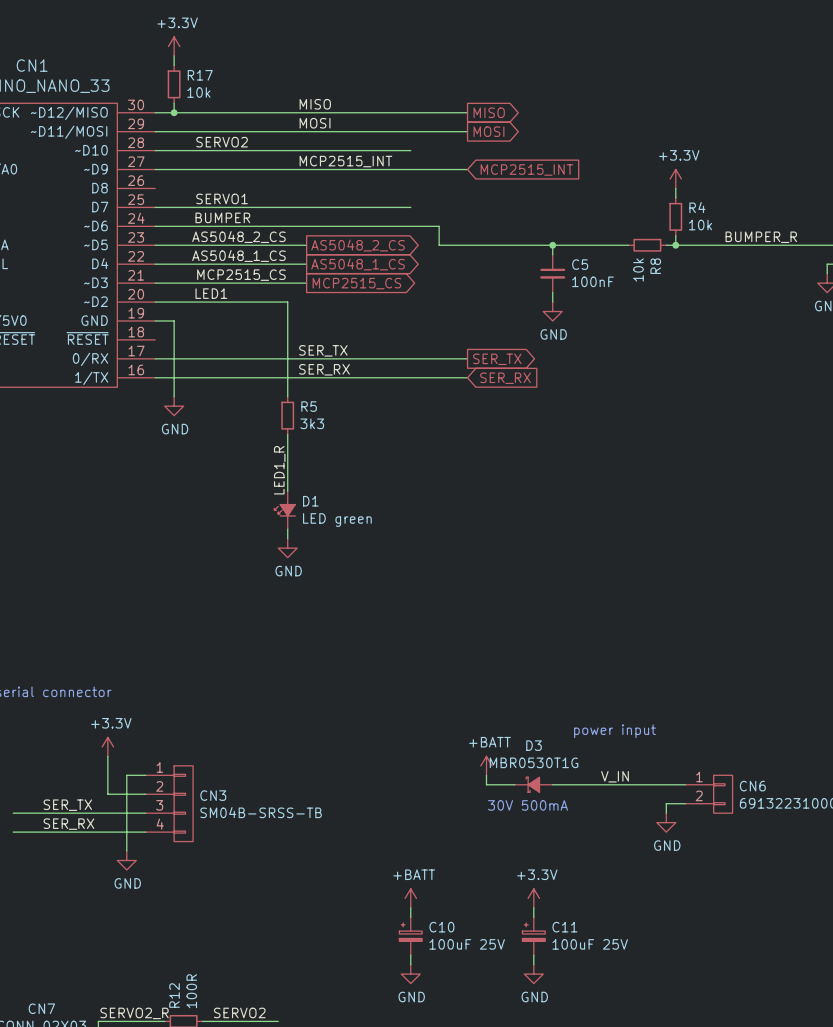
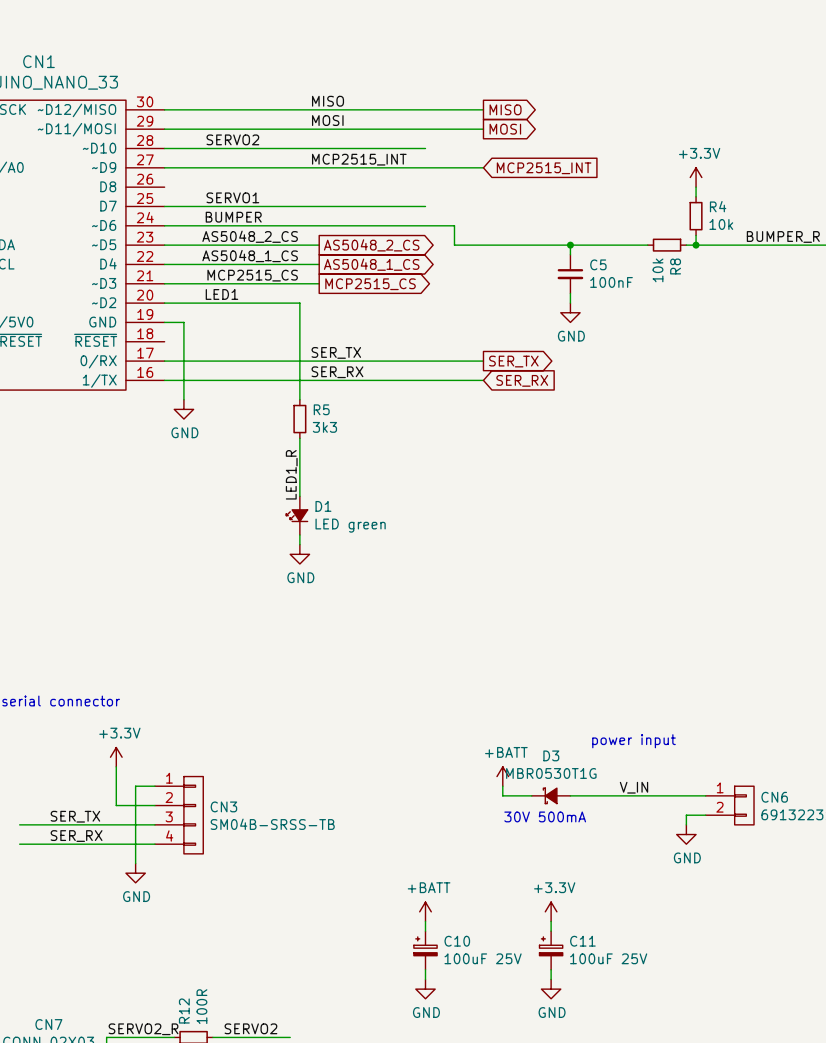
power symbol: +3.3V (174, 46) -> none
wire: (174, 55) (174, 65) -> none
R17: 10k (174, 84) -> none
wire: (174, 103) (174, 112) -> none
junction: (174, 112) -> none

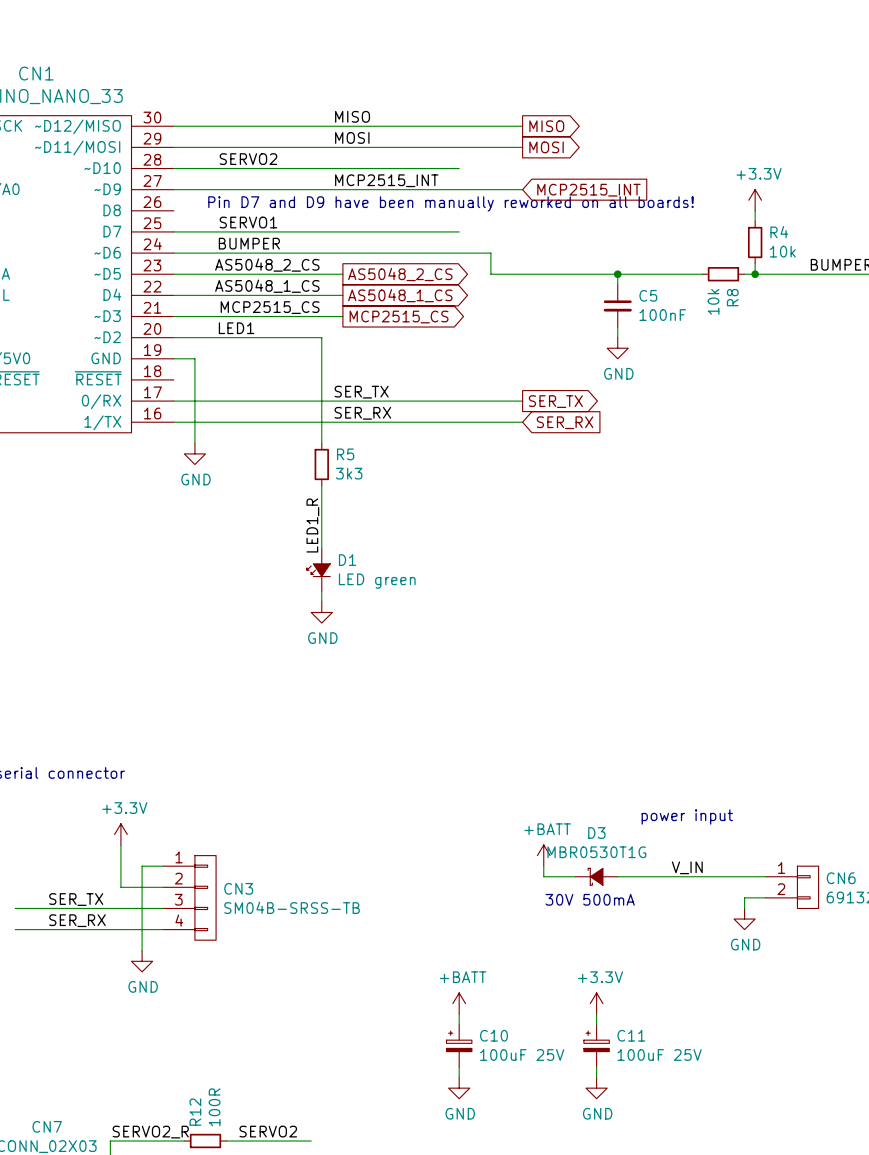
text: none -> Pin D7 and D9 have been manually reworked on all boards! (450, 203)

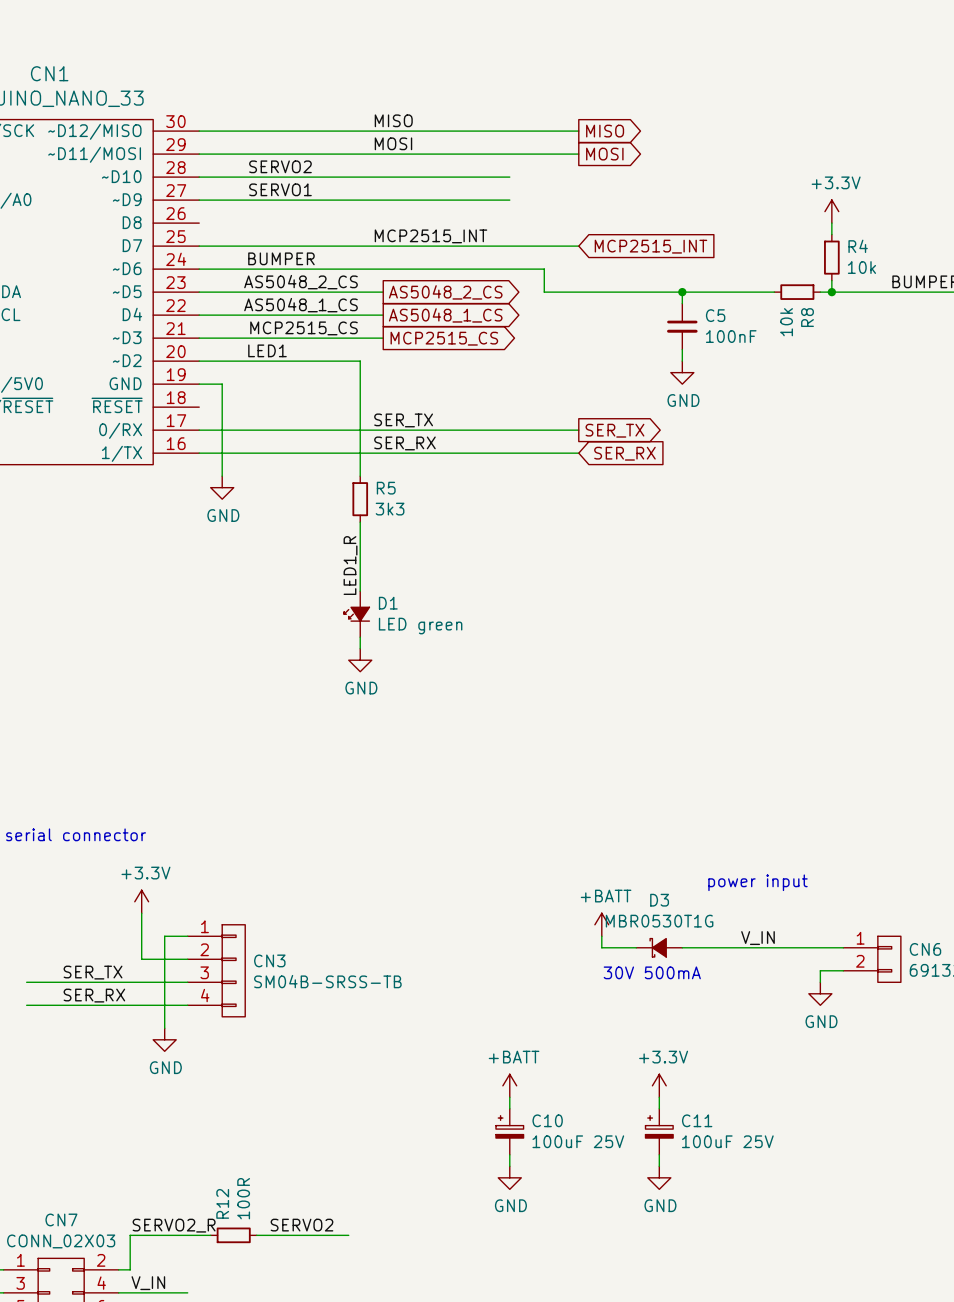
label position: MCP2515_INT (386, 180) -> MCP2515_INT (430, 236)
wire: (459, 189) (522, 189) -> (509, 246) (578, 246)
global label position: MCP2515_INT (588, 190) -> MCP2515_INT (650, 246)
text: Pin D7 and D9 have been manually reworked on all boards! (450, 203) -> none
label position: SERVO1 (248, 222) -> SERVO1 (280, 189)

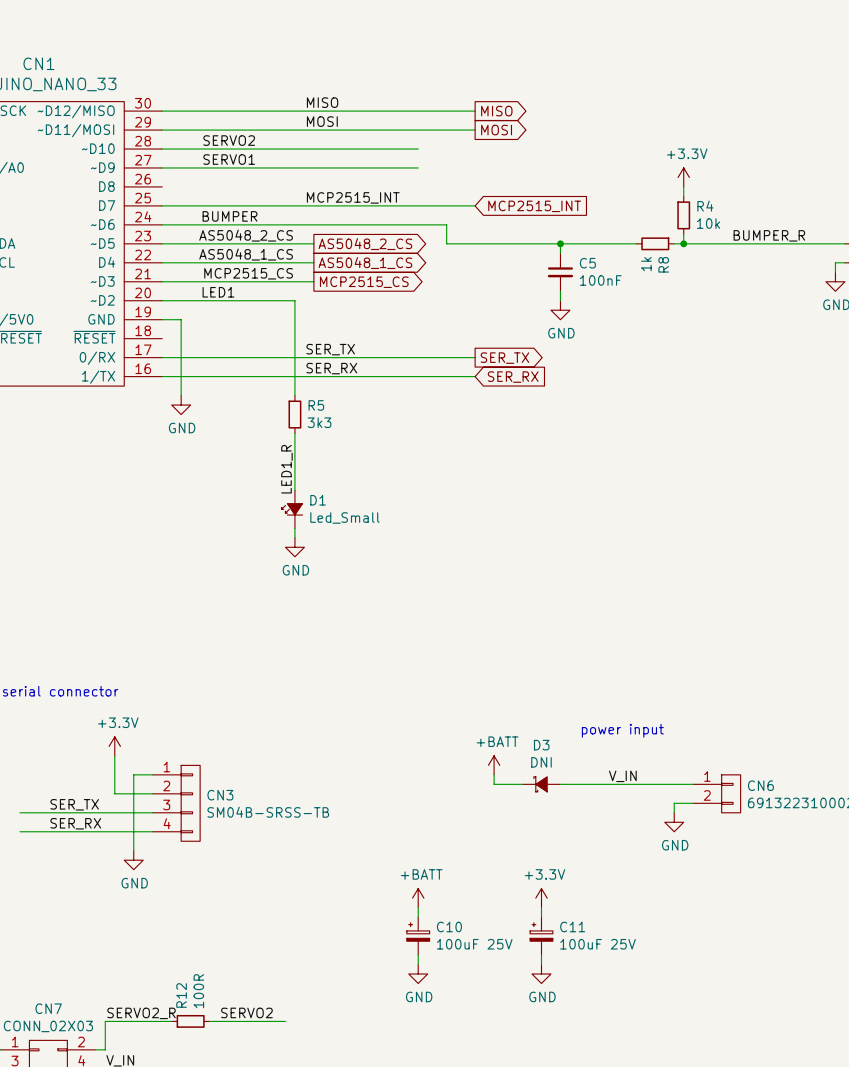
R8 value: 10k (786, 322) -> 1k (646, 264)
D1 value: LED green (420, 626) -> Led_Small (344, 517)
D3 value: MBR0530T1G (659, 921) -> DNI (541, 762)
text: 30V 500mA (652, 972) -> none

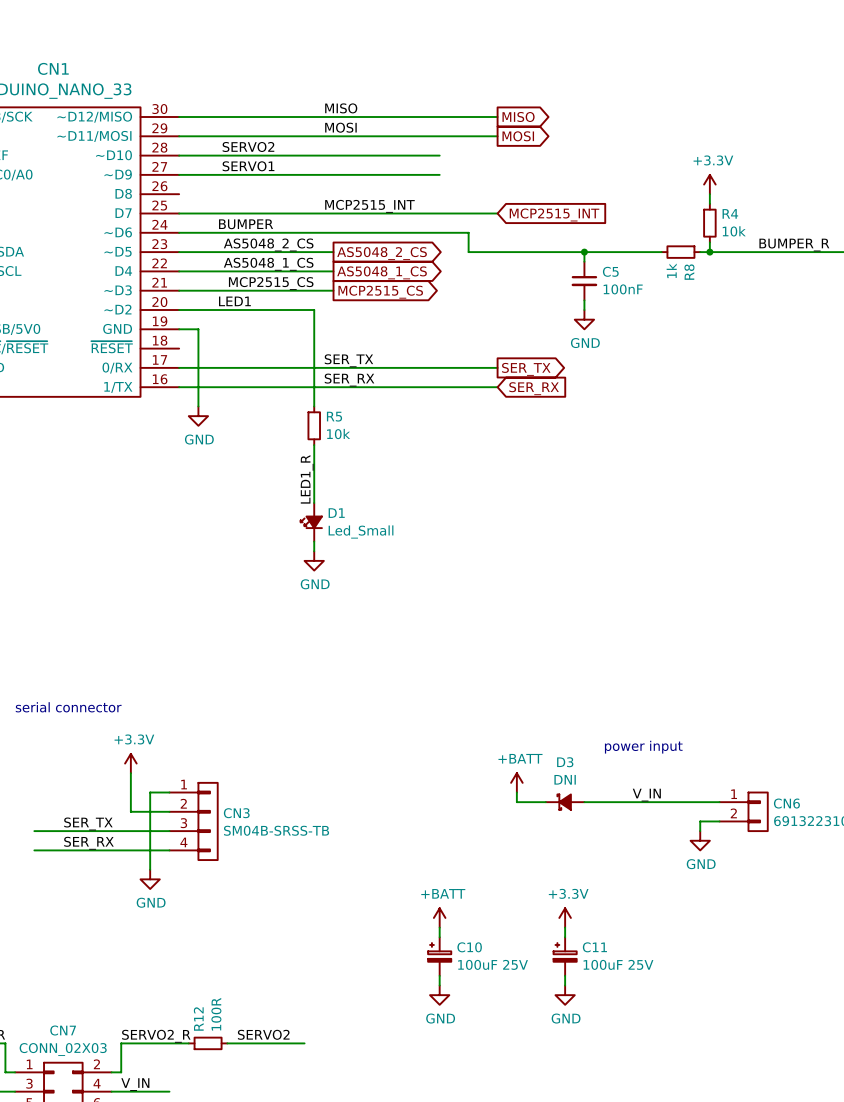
R5 value: 3k3 (319, 422) -> 10k (338, 434)

